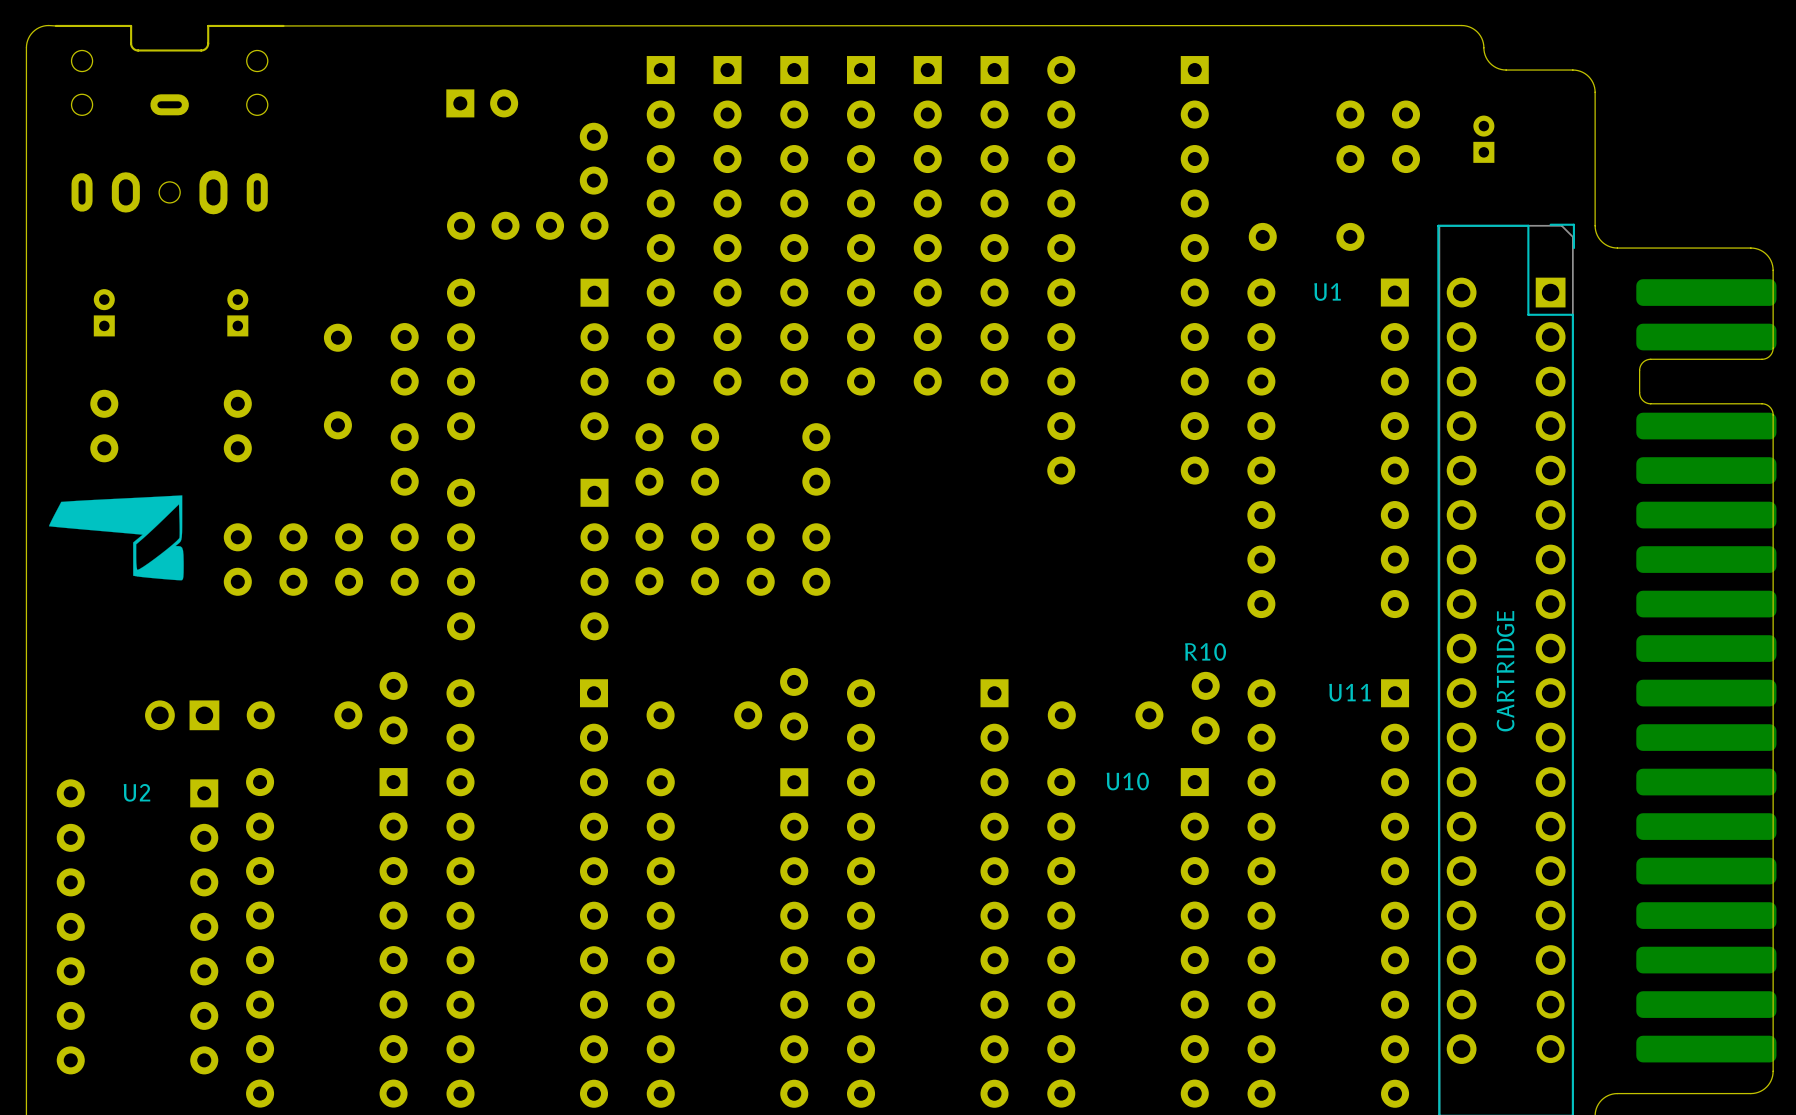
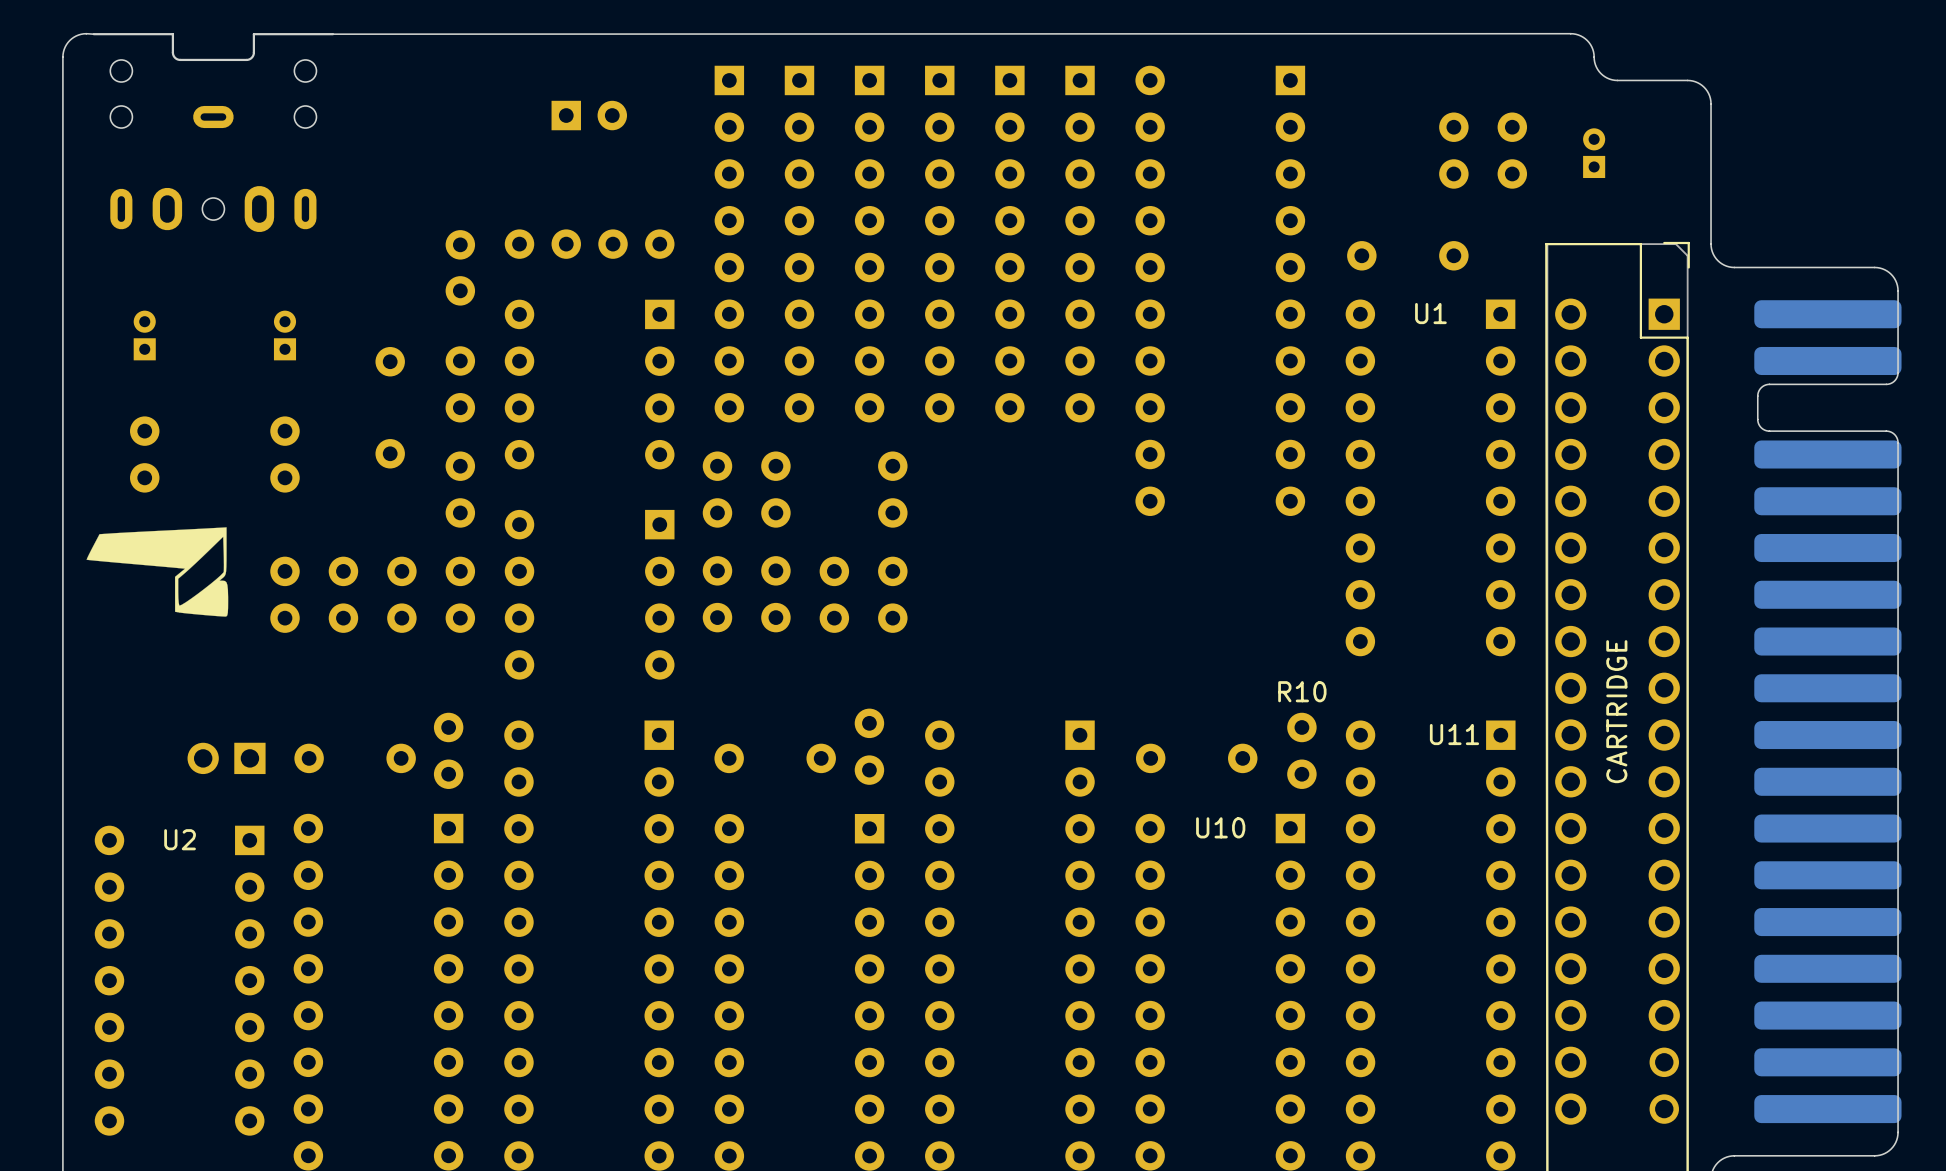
part position: (482, 103) -> (589, 115)
part position: (593, 158) -> (460, 267)

